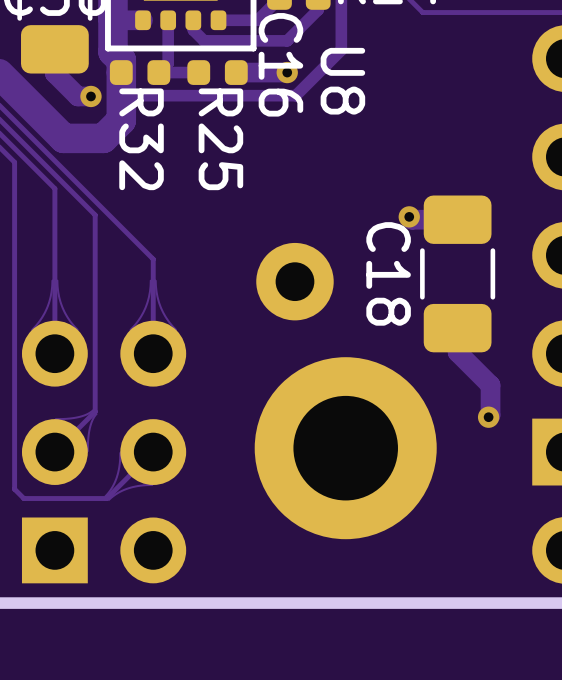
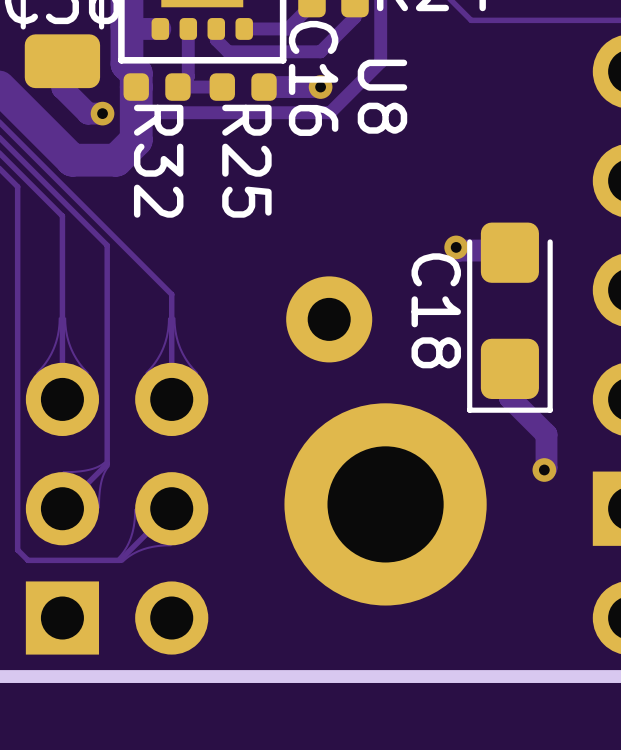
C18 footprint: [420, 195, 496, 353] -> [467, 222, 553, 413]

